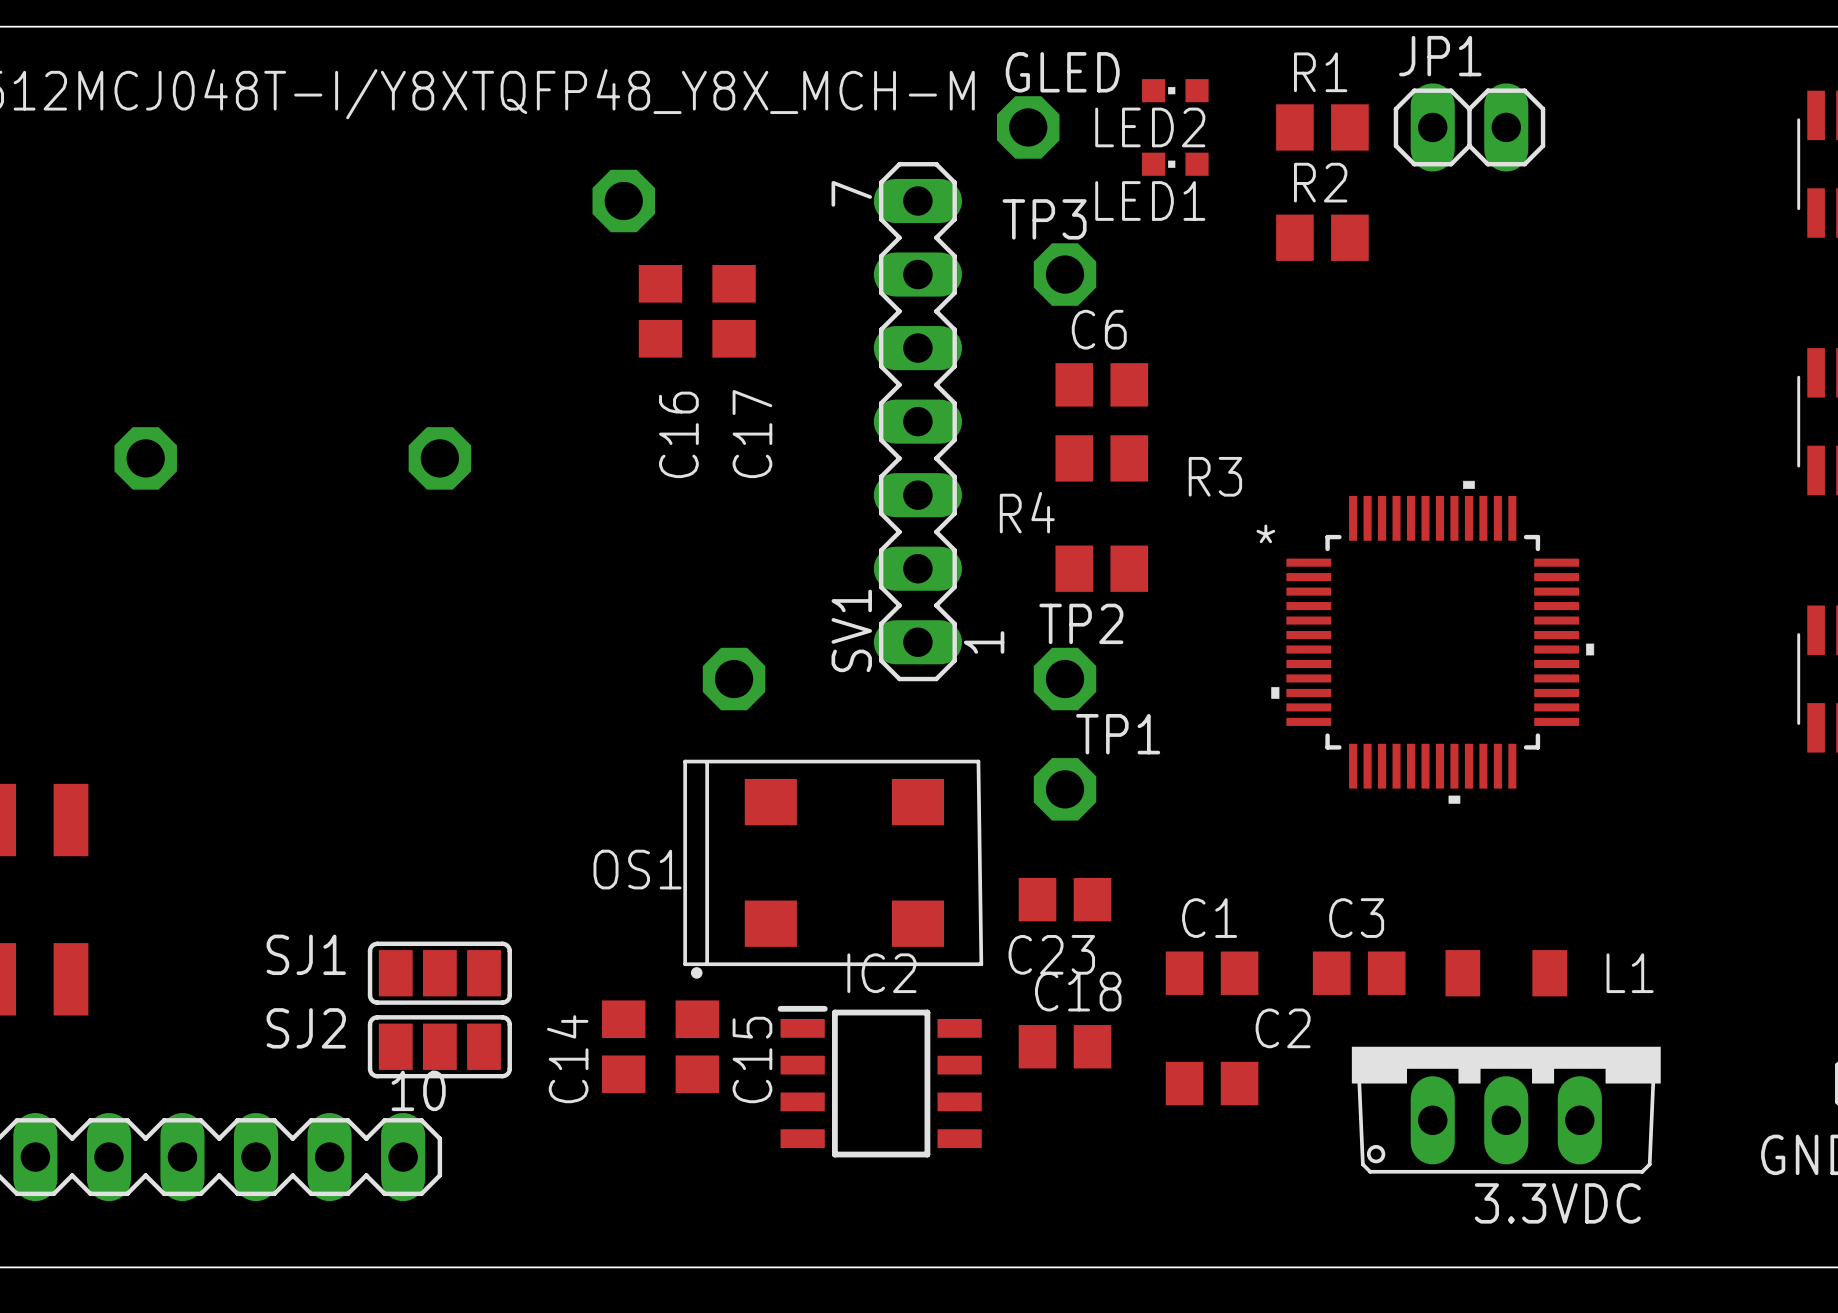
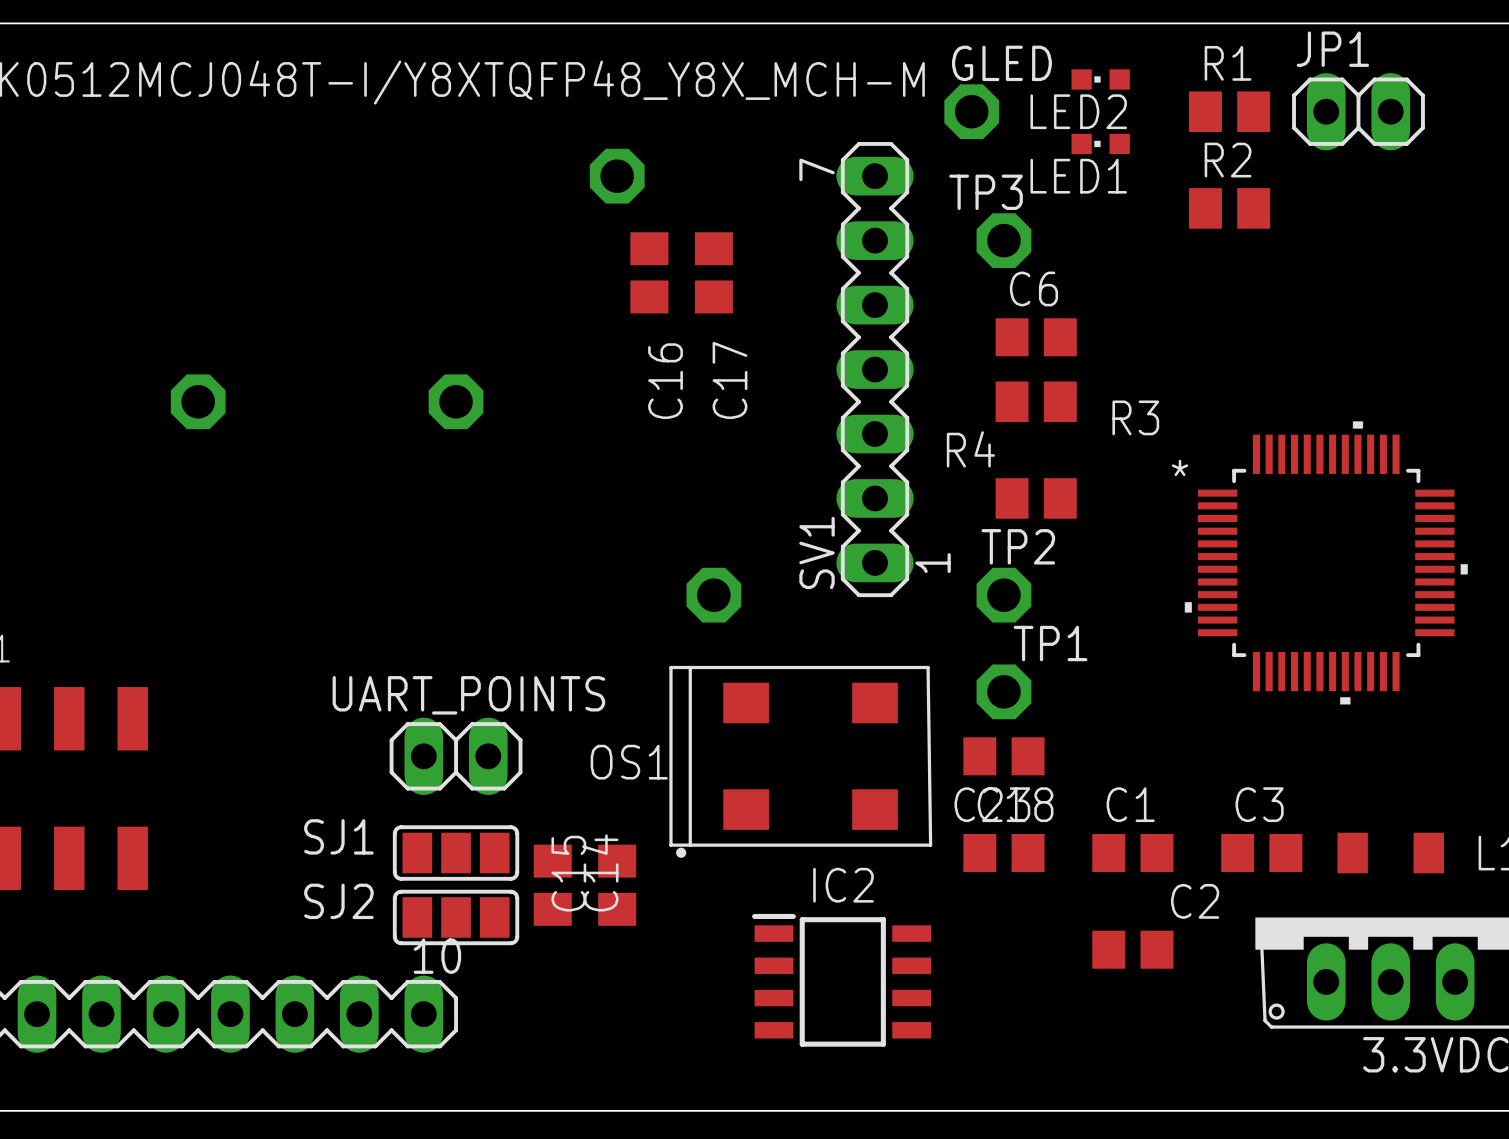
UART_POINTS: none -> (456, 756)
C23 position: (1065, 899) -> (1003, 756)
C14 position: (623, 1046) -> (552, 885)
C15 position: (697, 1046) -> (617, 885)
C18 position: (1065, 1046) -> (1003, 853)
C14 name position: C14 (567, 1059) -> C14 (600, 872)
C15 name position: C15 (752, 1059) -> C15 (568, 873)
IC2 position: (879, 1081) -> (841, 980)

